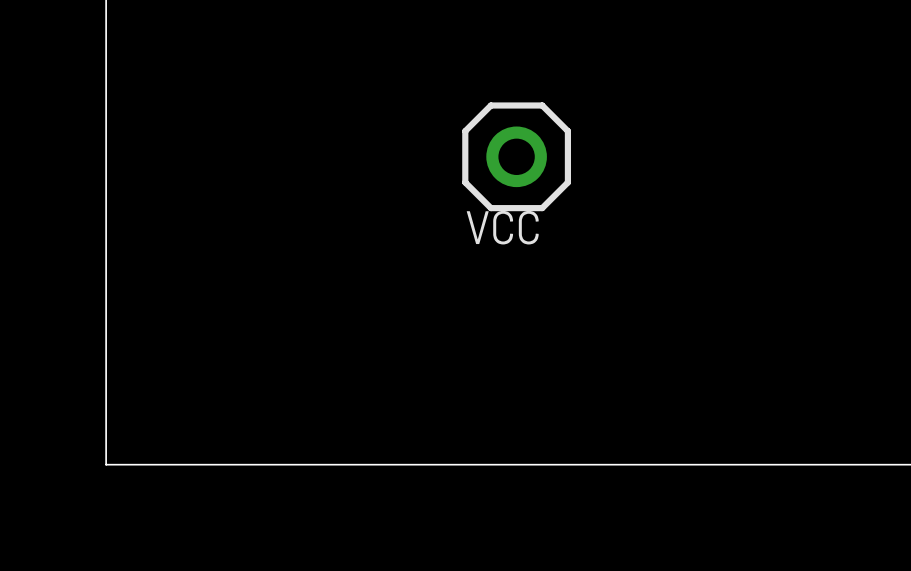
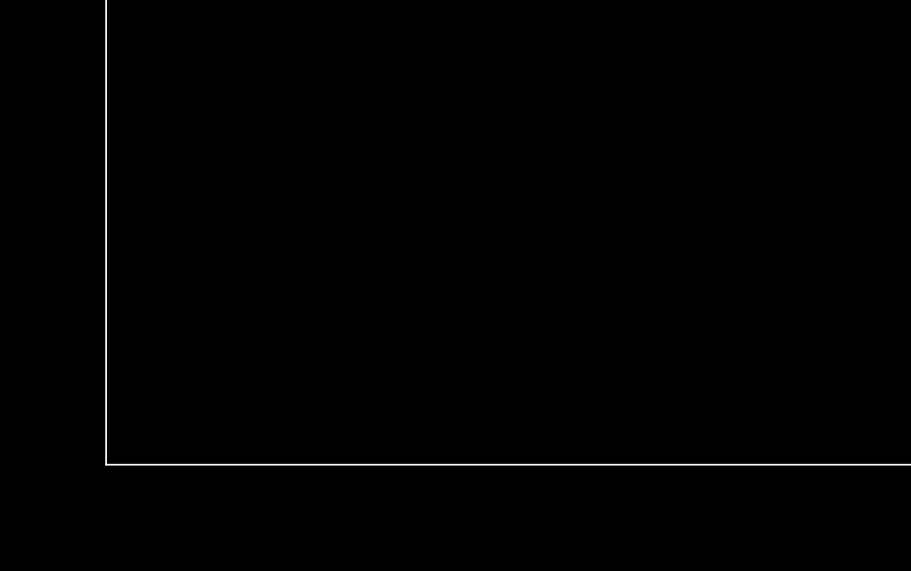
VCC: (516, 156) -> none

